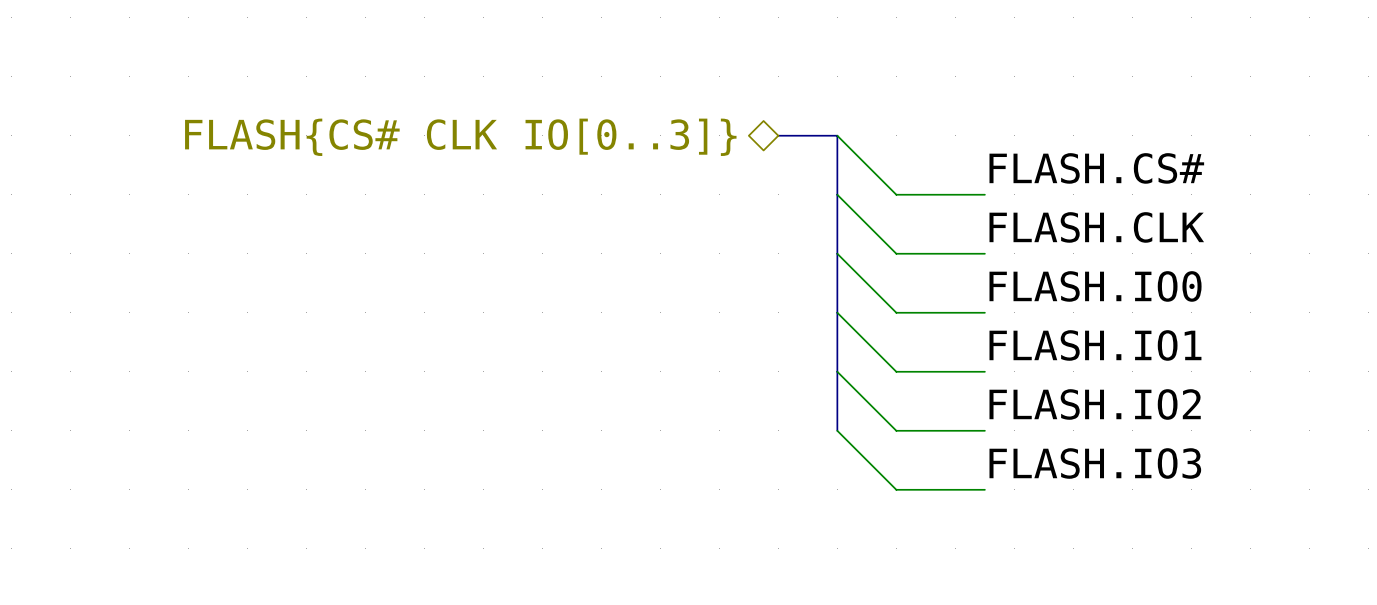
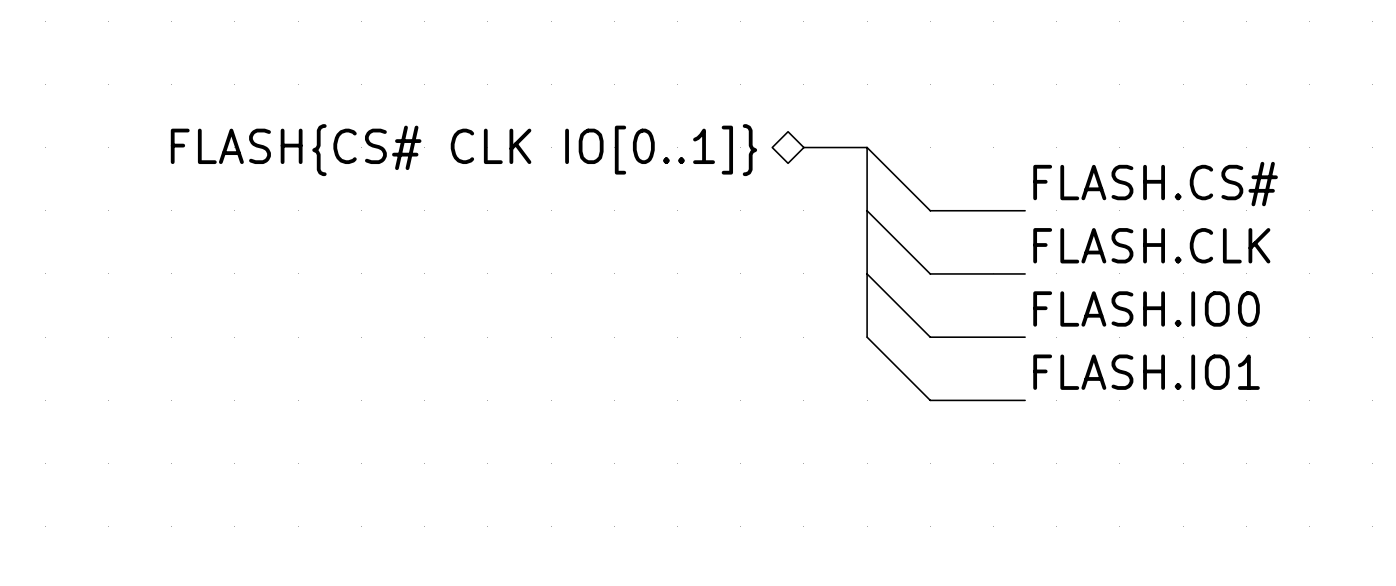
hierarchical label: FLASH{CS# CLK IO[0..3]} (460, 137) -> FLASH{CS# CLK IO[0..1]} (463, 150)
bus: (837, 312) (837, 430) -> none
wire: (837, 371) (896, 430) (984, 430) -> none
label: FLASH.IO2 (1095, 404) -> none
wire: (837, 430) (896, 489) (984, 489) -> none
label: FLASH.IO3 (1095, 463) -> none

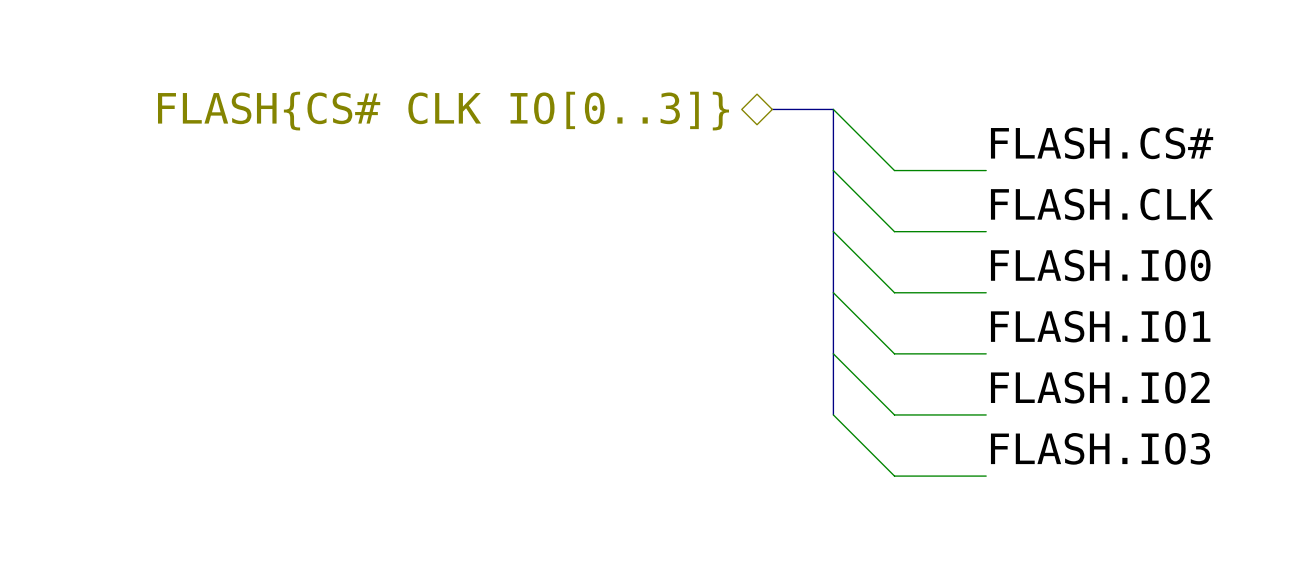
hierarchical label: FLASH{CS# CLK IO[0..1]} (463, 150) -> FLASH{CS# CLK IO[0..3]} (443, 111)
bus: none -> (833, 292) (833, 414)
wire: none -> (833, 353) (894, 414) (986, 414)
label: none -> FLASH.IO2 (1100, 387)
wire: none -> (833, 414) (894, 476) (986, 476)
label: none -> FLASH.IO3 (1100, 448)

